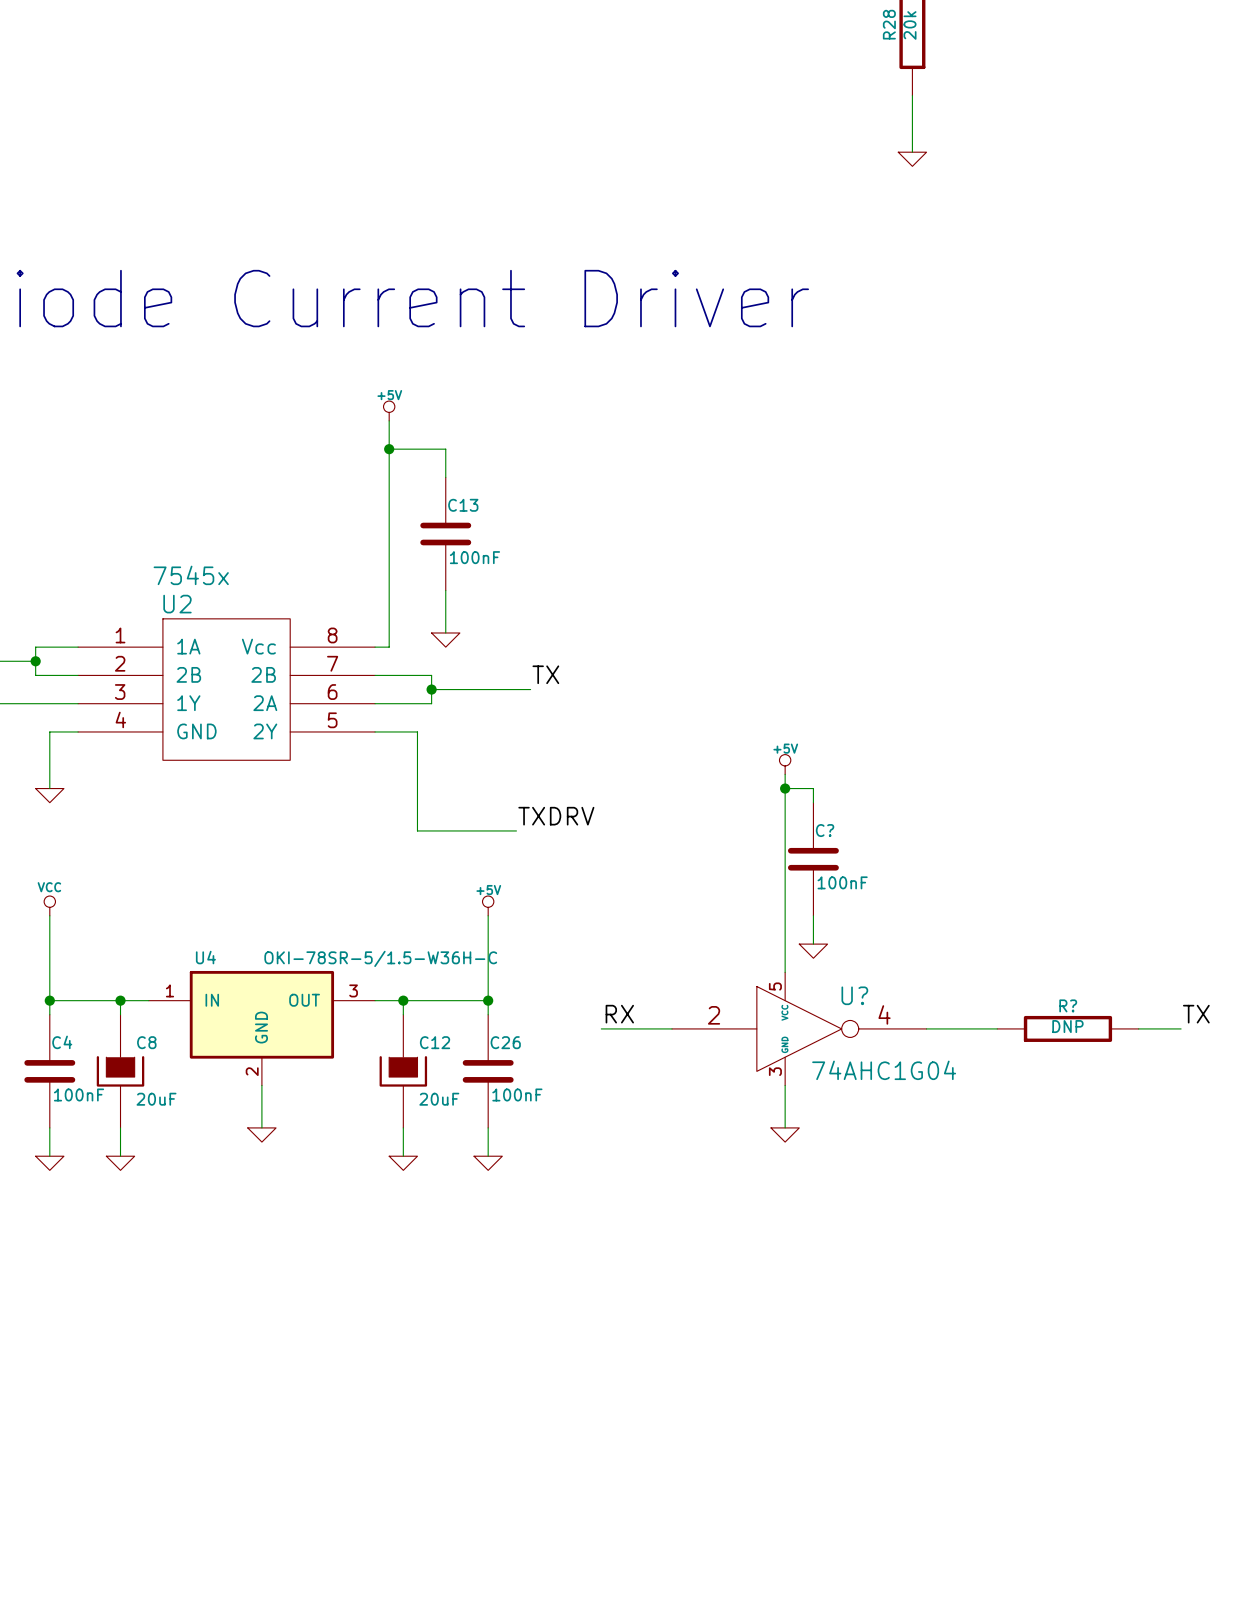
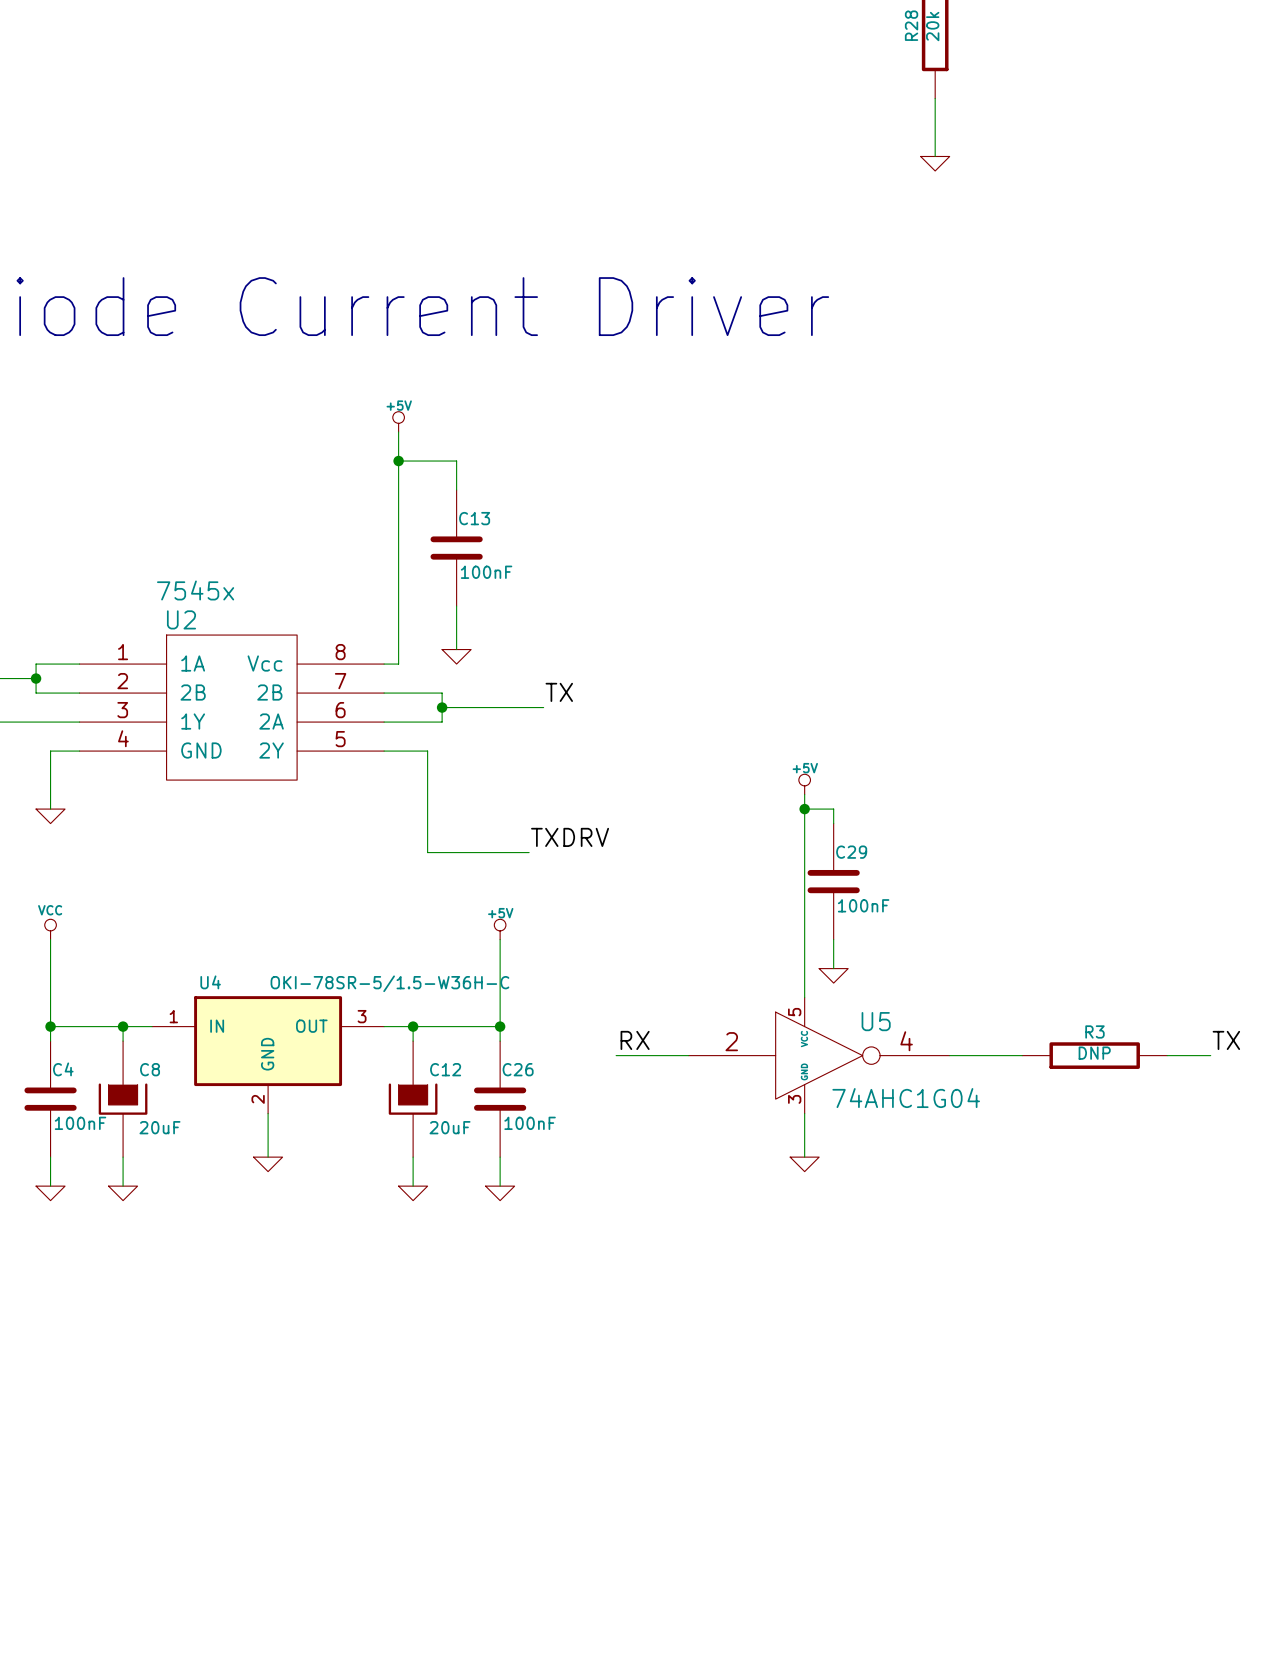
C? name: C? (825, 830) -> C29 (851, 852)
U? name: U? (854, 995) -> U5 (876, 1021)
R? name: R? (1068, 1005) -> R3 (1094, 1031)

